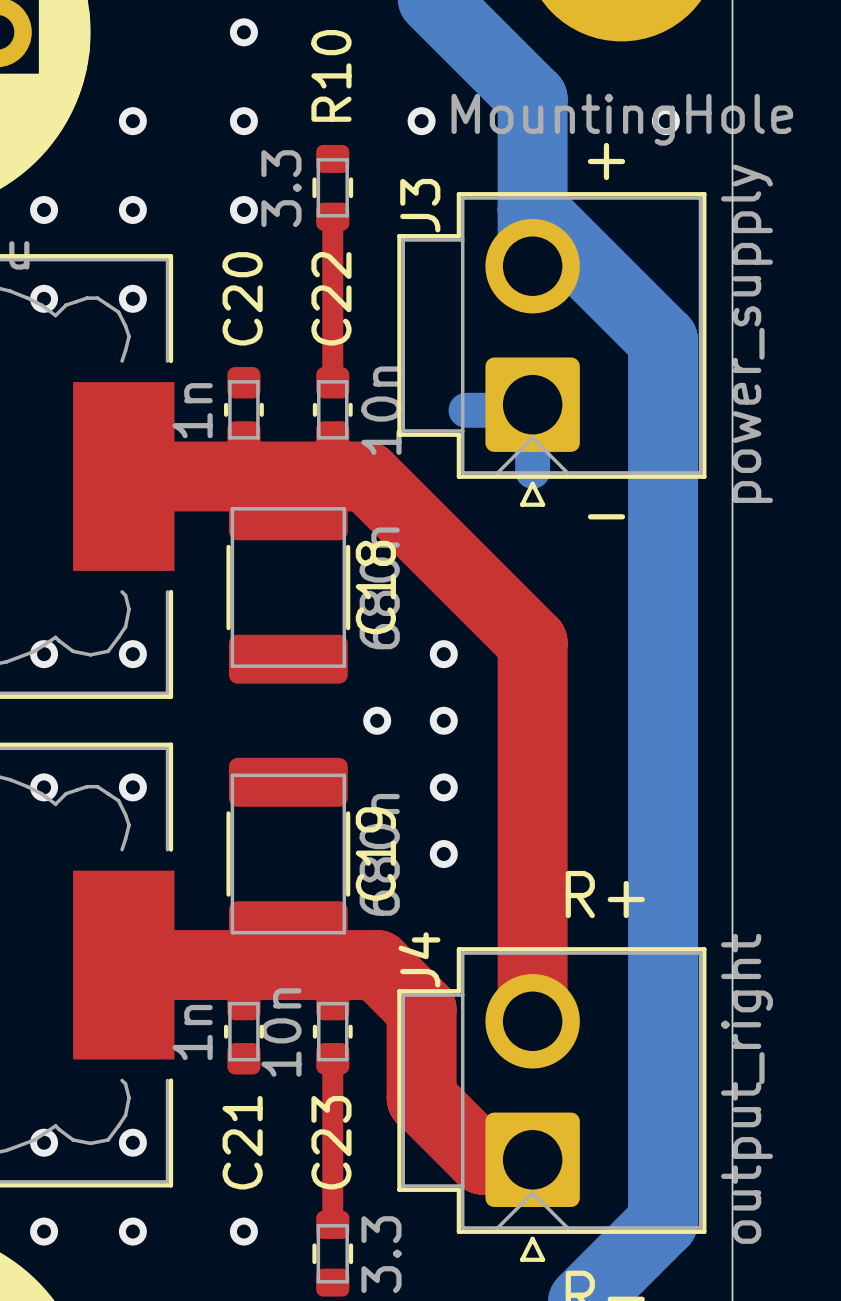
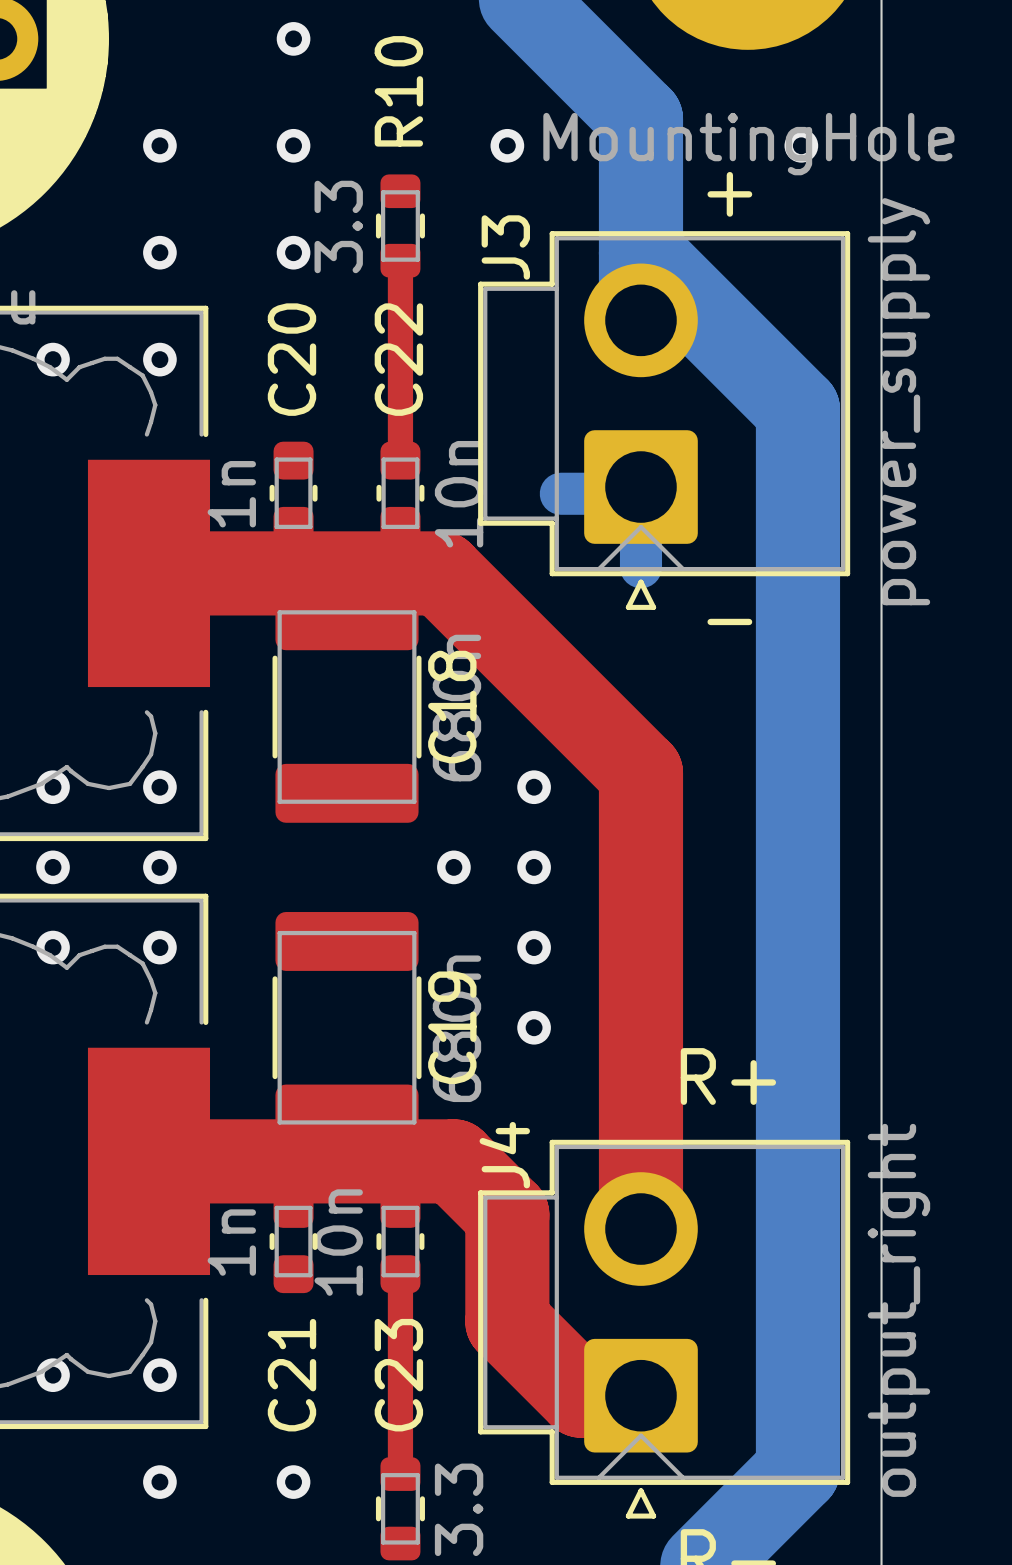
via: (44, 209) -> none
via: none -> (53, 867)
via: none -> (159, 867)
via: (44, 1231) -> none

